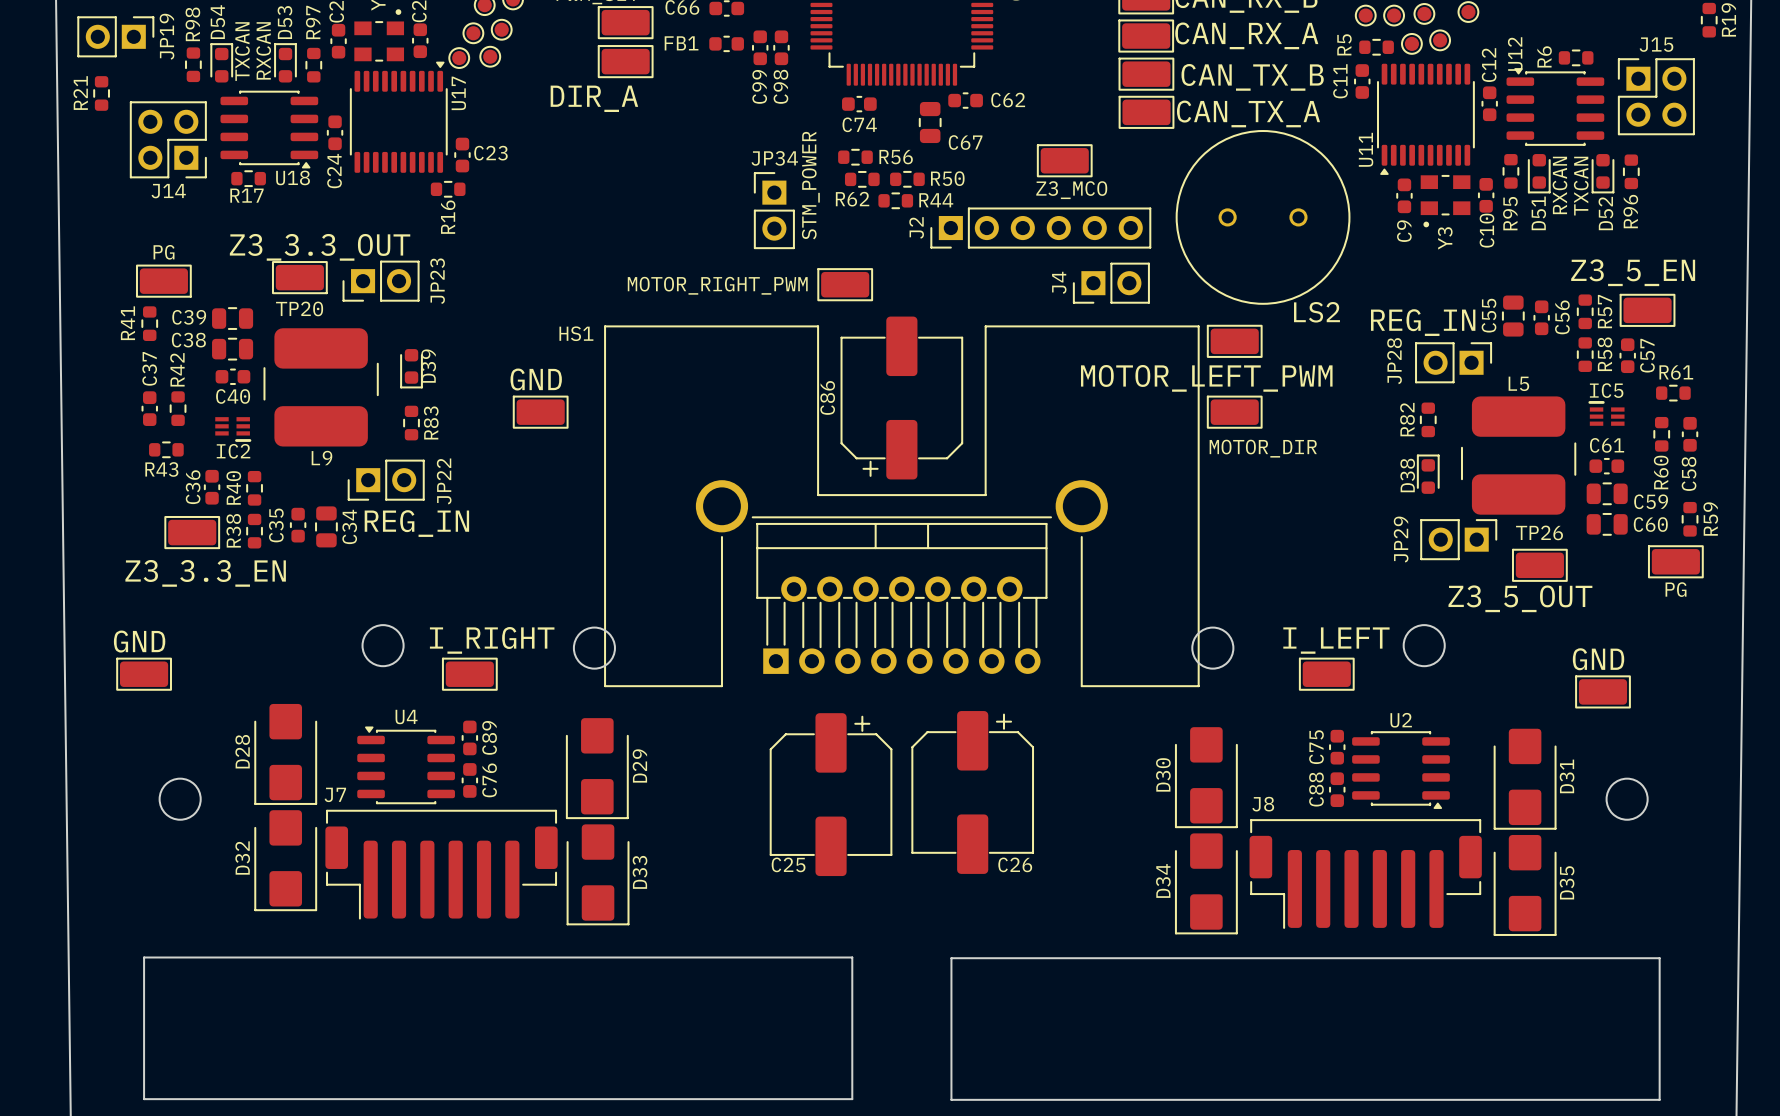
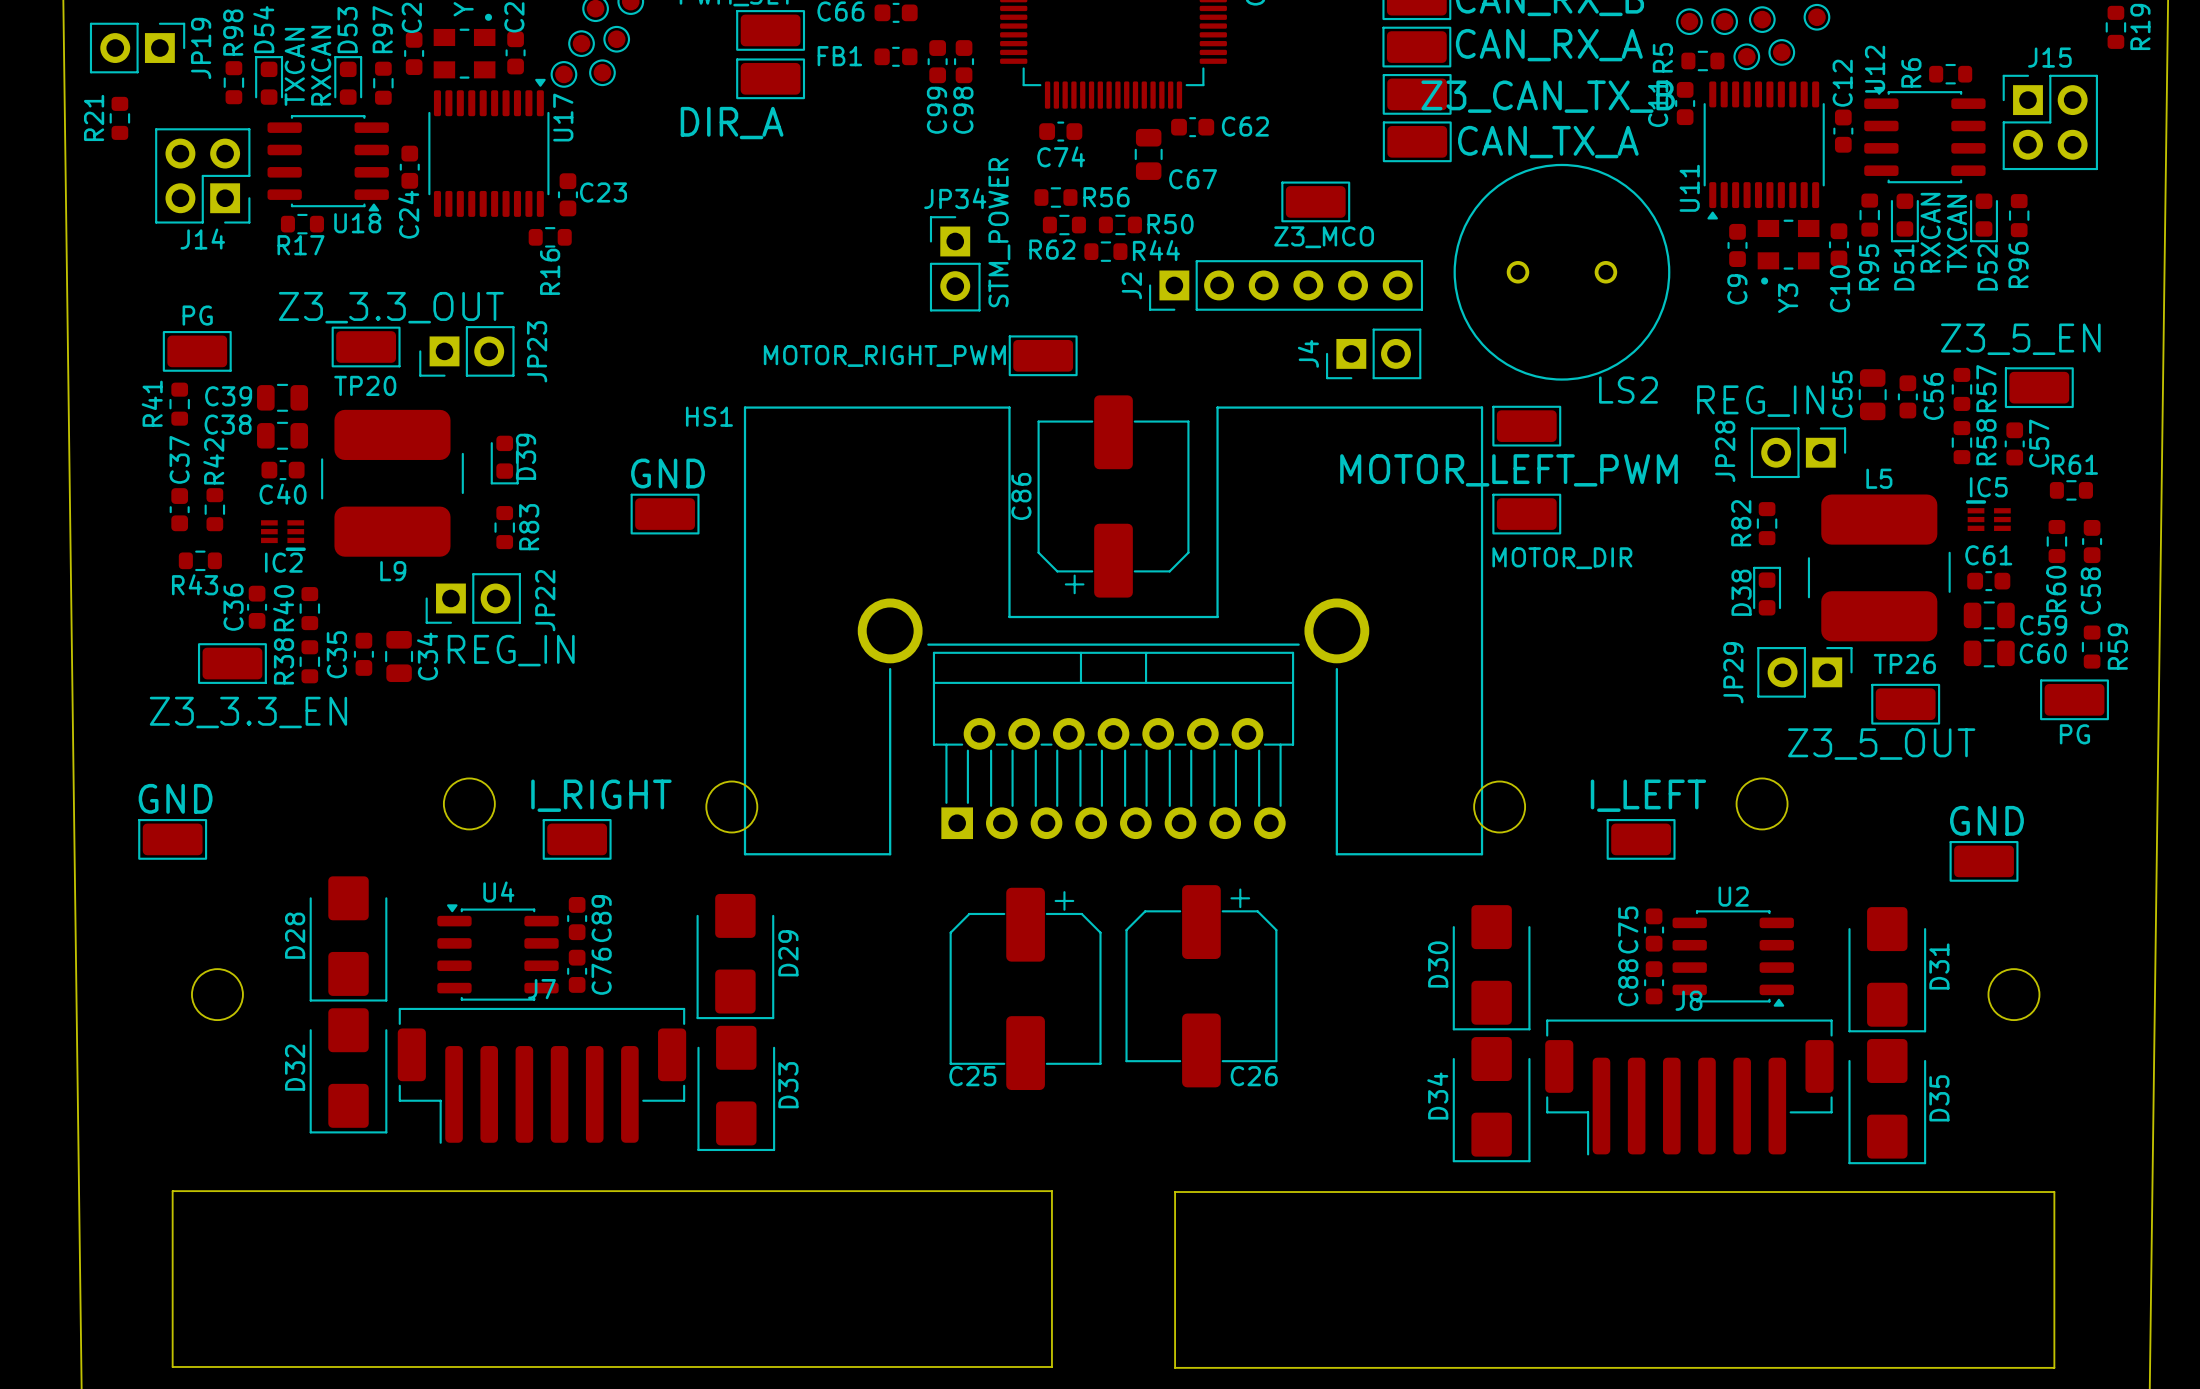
part value: CAN_TX_B (1252, 77) -> Z3_CAN_TX_B (1548, 96)
J7 name position: J7 (335, 794) -> J7 (541, 989)
J8 name position: J8 (1263, 804) -> J8 (1688, 1000)

